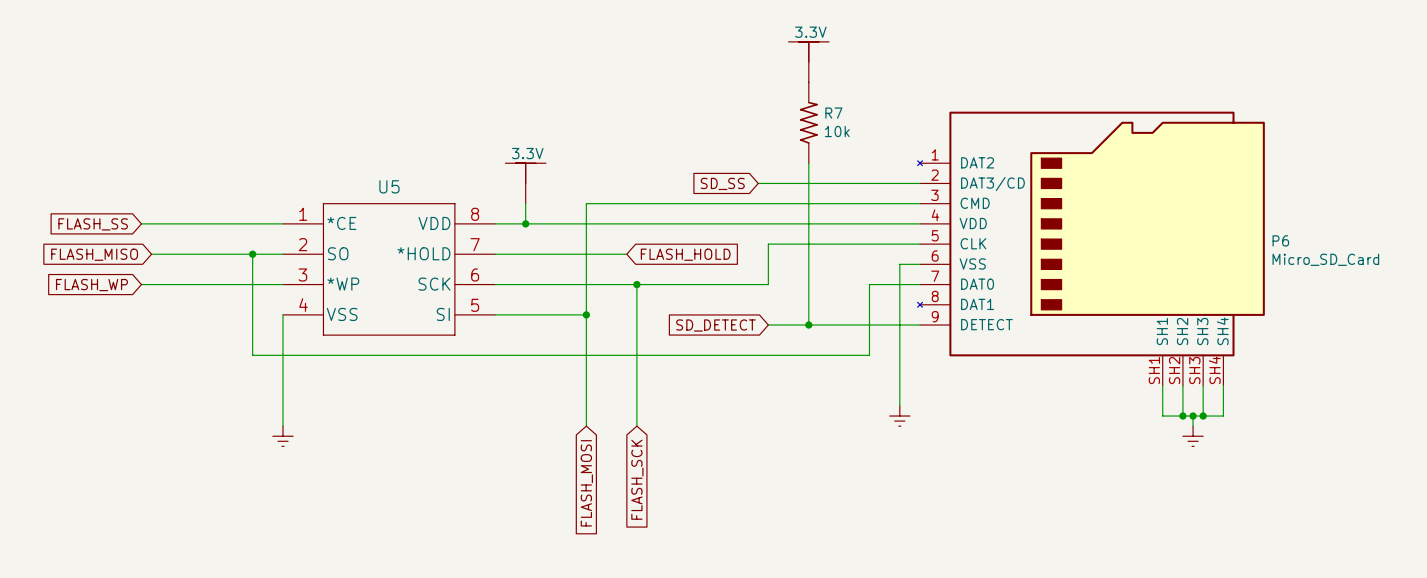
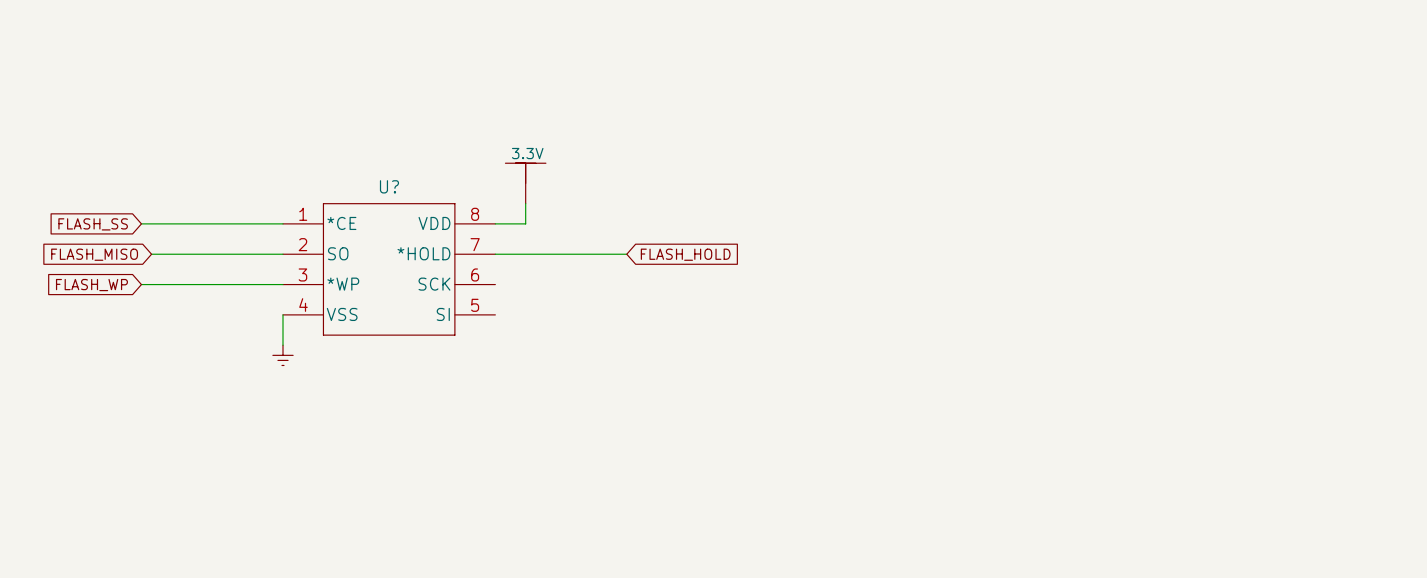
power symbol: 3.3V (808, 62) -> none
R7: 10k (808, 122) -> none
wire: (808, 163) (808, 325) -> none
global label: SD_SS (722, 183) -> none
wire: (758, 183) (920, 183) -> none
U5 name: U5 (389, 186) -> U? (389, 186)
wire: (920, 203) (586, 203) (586, 426) -> none
wire: (525, 223) (920, 223) -> none
junction: (525, 223) -> none
wire: (920, 244) (768, 244) (768, 284) (495, 284) -> none
P6: Micro_SD_Card (1091, 248) -> none
wire: (252, 254) (252, 355) (869, 355) (869, 284) (920, 284) -> none
junction: (252, 254) -> none
wire: (920, 264) (899, 264) (899, 405) -> none
wire: (636, 284) (636, 426) -> none
junction: (636, 284) -> none
wire: (495, 314) (586, 314) -> none
junction: (586, 314) -> none
global label: SD_DETECT (715, 325) -> none
wire: (768, 325) (920, 325) -> none
junction: (808, 325) -> none
wire: (283, 345) (283, 426) -> none
wire: (1162, 385) (1162, 416) (1223, 416) (1223, 385) -> none
wire: (1182, 385) (1182, 416) -> none
wire: (1203, 385) (1203, 416) -> none
power symbol: (899, 416) -> none
junction: (1182, 416) -> none
wire: (1193, 416) (1193, 426) -> none
junction: (1193, 416) -> none
junction: (1203, 416) -> none
power symbol position: (283, 436) -> (283, 355)
power symbol: (1193, 436) -> none
global label: FLASH_SCK (637, 479) -> none
global label: FLASH_MOSI (586, 483) -> none

